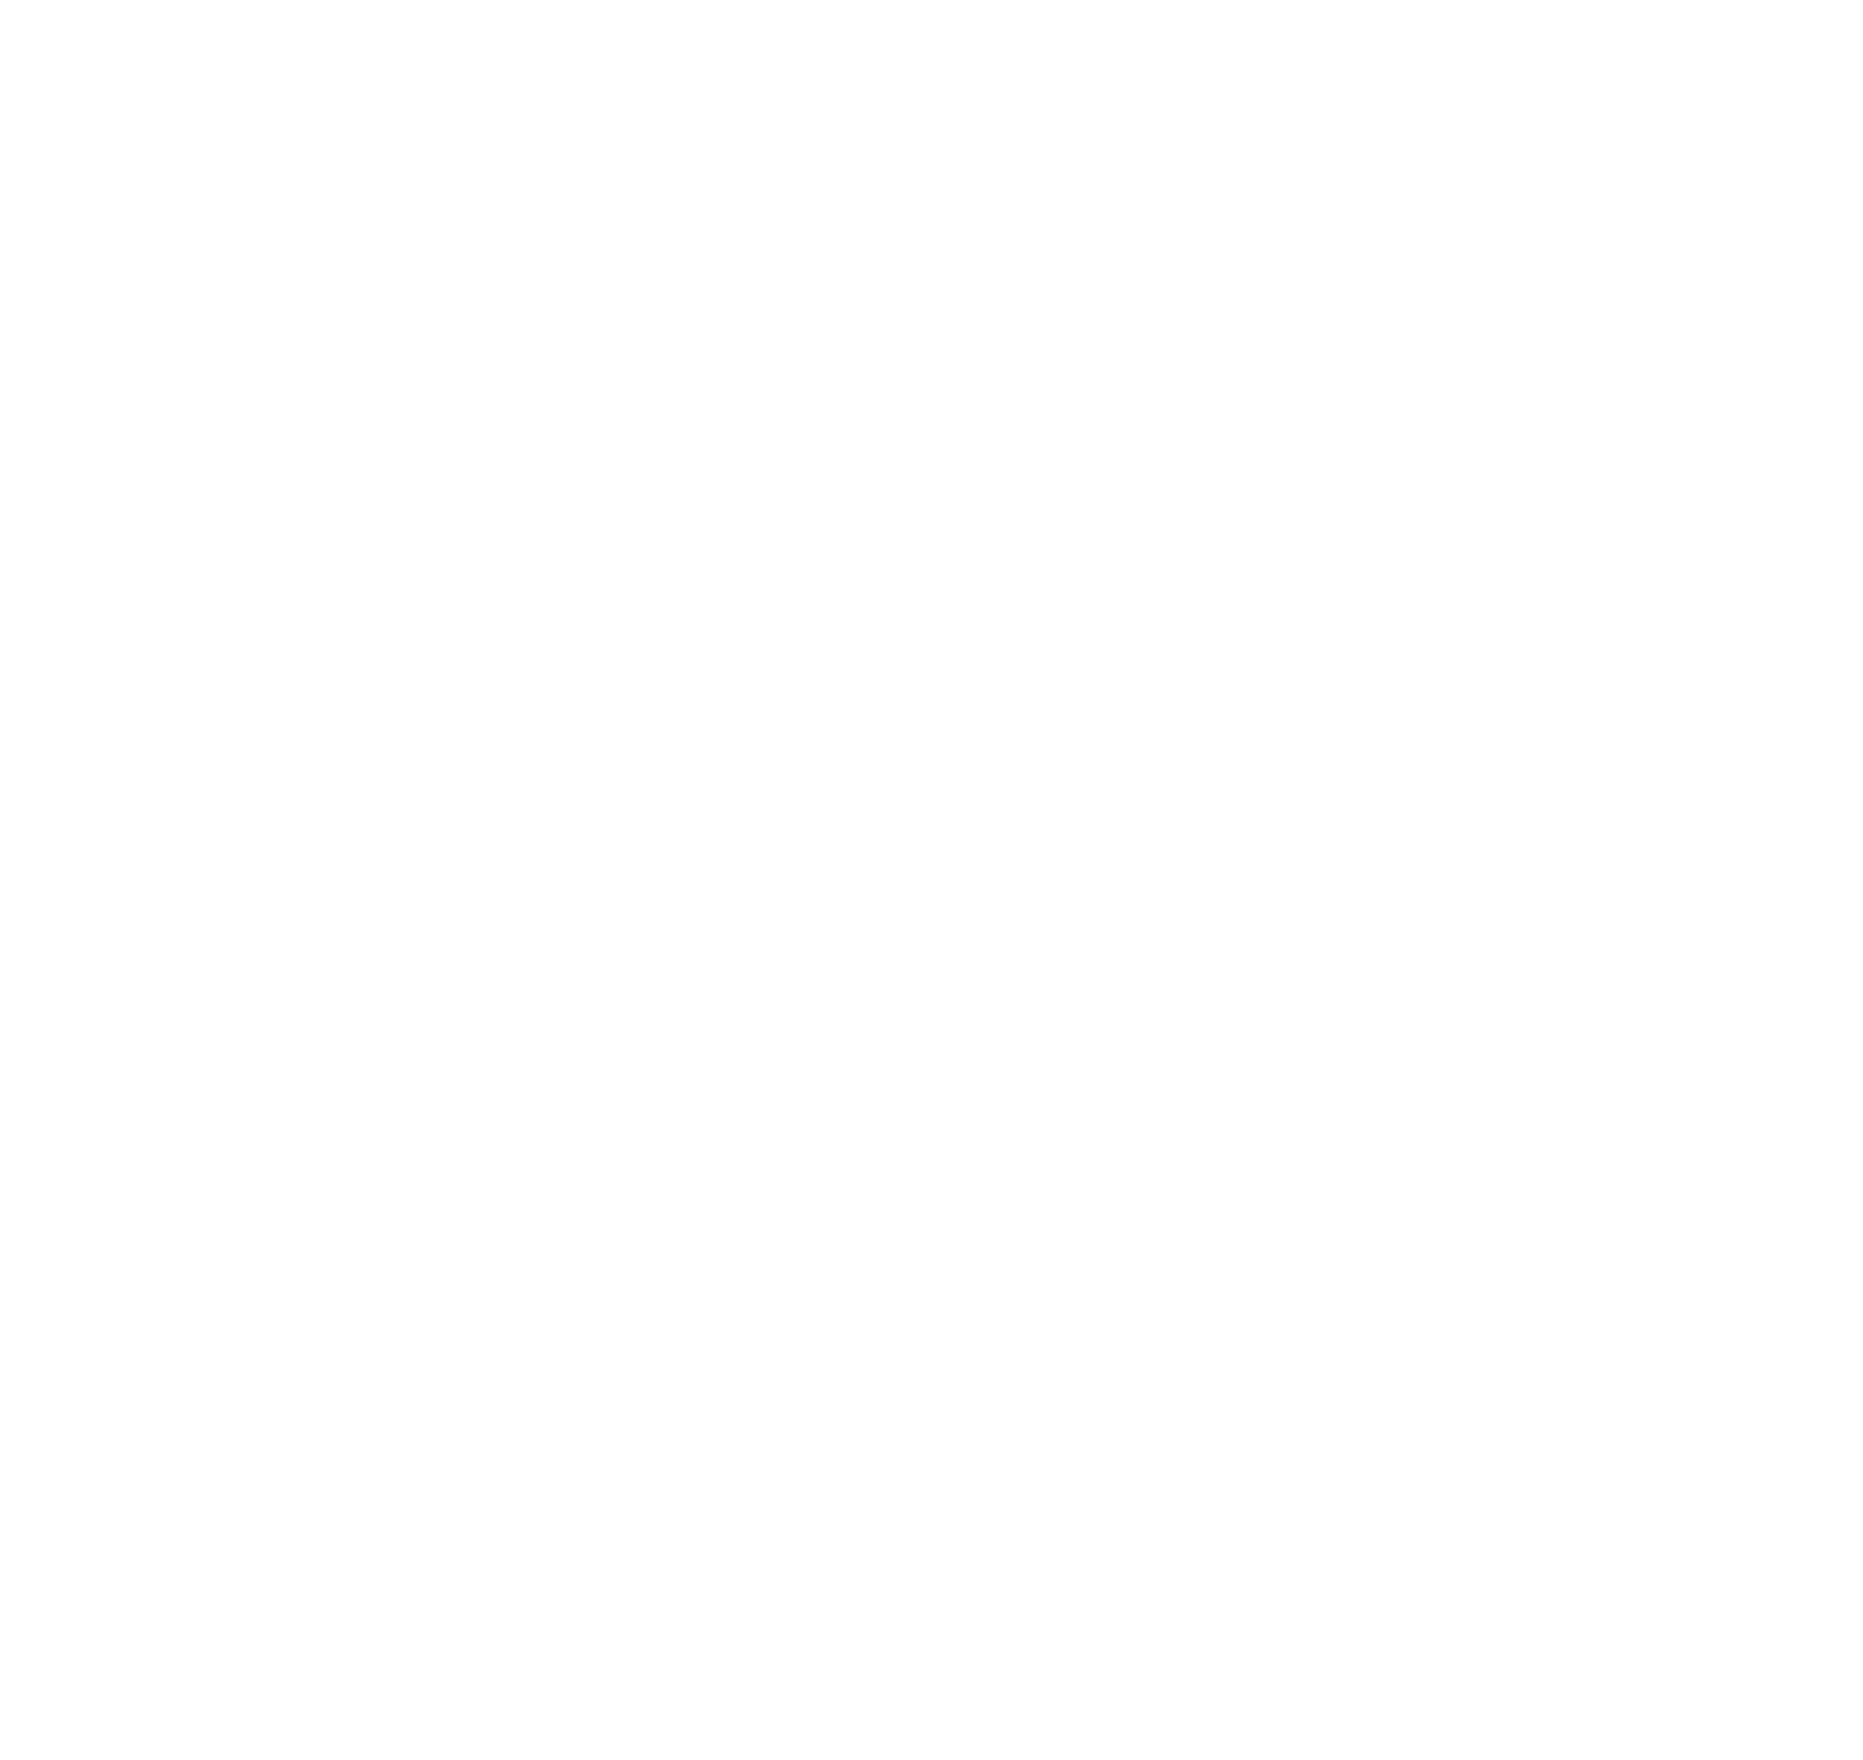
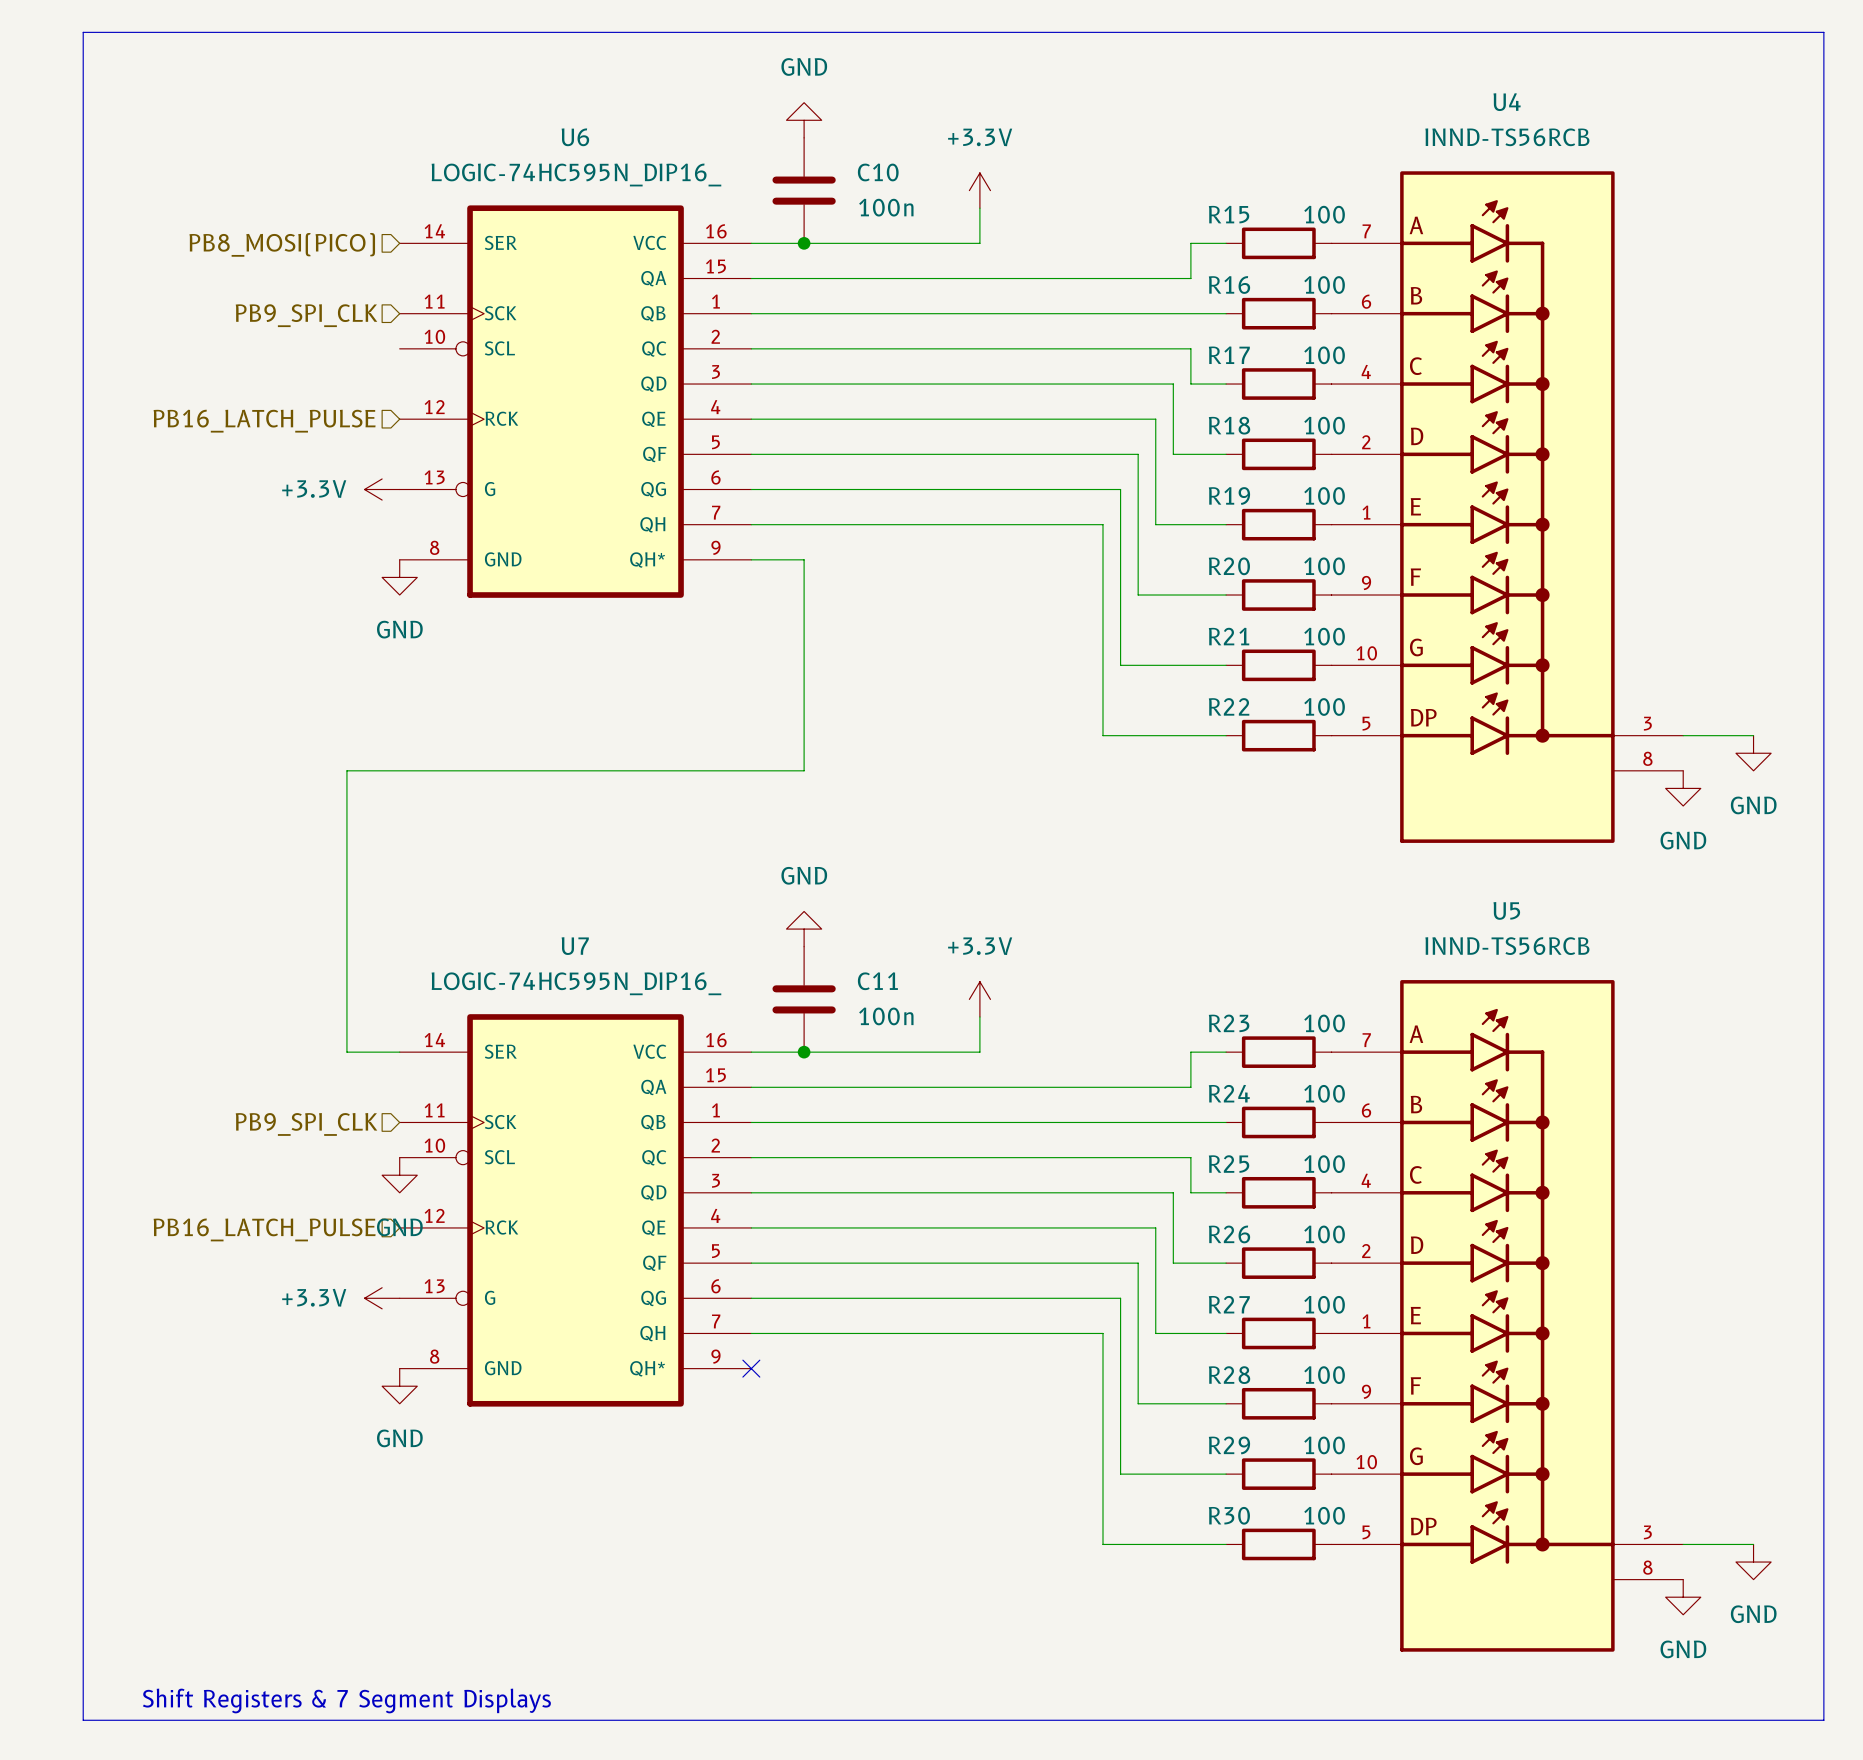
line: none -> (83, 32) (1823, 32) (1823, 1720) (83, 1720) (83, 32)
power symbol: none -> GND (804, 120)
C10: none -> 100n (804, 190)
power symbol: none -> +3.3V (979, 190)
wire: none -> (979, 208) (979, 243) (751, 243)
junction: none -> (804, 243)
wire: none -> (1226, 243) (1190, 243) (1190, 278) (751, 278)
R15: none -> 100 (1278, 243)
hierarchical label: none -> PB8_MOSI(PICO) (282, 244)
wire: none -> (751, 313) (1226, 313)
R16: none -> 100 (1278, 313)
hierarchical label: none -> PB9_SPI_CLK (306, 315)
wire: none -> (751, 348) (1190, 348) (1190, 384) (1226, 384)
wire: none -> (751, 384) (1173, 384) (1173, 454) (1226, 454)
R17: none -> 100 (1278, 384)
U6: none -> LOGIC-74HC595N_DIP16_ (575, 401)
wire: none -> (751, 419) (1155, 419) (1155, 524) (1226, 524)
hierarchical label: none -> PB16_LATCH_PULSE (264, 421)
wire: none -> (751, 454) (1138, 454) (1138, 595) (1226, 595)
R18: none -> 100 (1278, 454)
power symbol: none -> +3.3V (382, 489)
wire: none -> (751, 489) (1120, 489) (1120, 665) (1226, 665)
U4: none -> INND-TS56RCB (1507, 507)
wire: none -> (751, 524) (1102, 524) (1102, 735) (1226, 735)
R19: none -> 100 (1278, 524)
wire: none -> (751, 559) (804, 559) (804, 770) (346, 770) (346, 1052) (399, 1052)
power symbol: none -> GND (399, 577)
R20: none -> 100 (1278, 595)
R21: none -> 100 (1278, 665)
R22: none -> 100 (1278, 735)
wire: none -> (1683, 735) (1753, 735)
power symbol: none -> GND (1753, 753)
power symbol: none -> GND (1683, 788)
power symbol: none -> GND (804, 929)
C11: none -> 100n (804, 999)
power symbol: none -> +3.3V (979, 999)
wire: none -> (979, 1016) (979, 1052) (751, 1052)
junction: none -> (804, 1052)
wire: none -> (1226, 1052) (1190, 1052) (1190, 1087) (751, 1087)
R23: none -> 100 (1278, 1052)
wire: none -> (751, 1122) (1226, 1122)
R24: none -> 100 (1278, 1122)
hierarchical label: none -> PB9_SPI_CLK (306, 1124)
wire: none -> (751, 1157) (1190, 1157) (1190, 1192) (1226, 1192)
power symbol: none -> GND (399, 1175)
wire: none -> (751, 1192) (1173, 1192) (1173, 1263) (1226, 1263)
R25: none -> 100 (1278, 1192)
U7: none -> LOGIC-74HC595N_DIP16_ (575, 1210)
wire: none -> (751, 1227) (1155, 1227) (1155, 1333) (1226, 1333)
hierarchical label: none -> PB16_LATCH_PULSE (264, 1229)
wire: none -> (751, 1263) (1138, 1263) (1138, 1403) (1226, 1403)
R26: none -> 100 (1278, 1263)
power symbol: none -> +3.3V (382, 1298)
wire: none -> (751, 1298) (1120, 1298) (1120, 1474) (1226, 1474)
U5: none -> INND-TS56RCB (1507, 1315)
wire: none -> (751, 1333) (1102, 1333) (1102, 1544) (1226, 1544)
R27: none -> 100 (1278, 1333)
no-connect mark: none -> (751, 1368)
power symbol: none -> GND (399, 1386)
R28: none -> 100 (1278, 1403)
R29: none -> 100 (1278, 1474)
R30: none -> 100 (1278, 1544)
wire: none -> (1683, 1544) (1753, 1544)
power symbol: none -> GND (1753, 1562)
power symbol: none -> GND (1683, 1597)
text: none -> Shift Registers & 7 Segment Displays (346, 1700)

